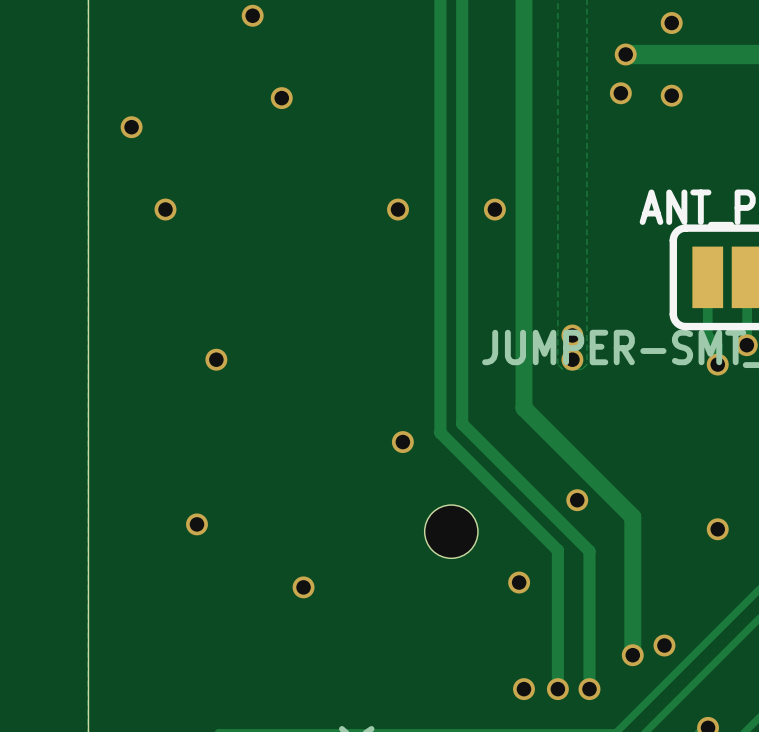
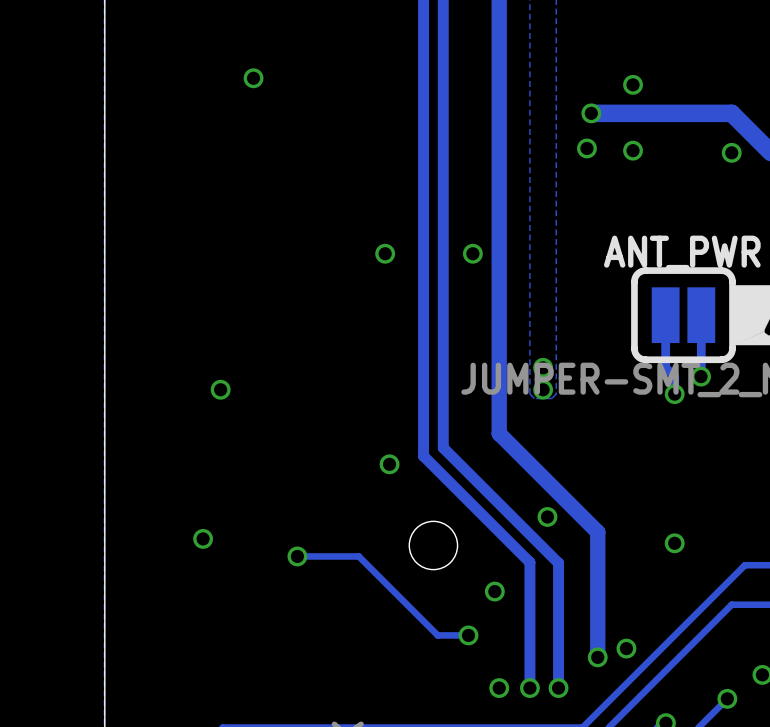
via: (281, 98) -> none
via: (131, 127) -> none
via: (165, 209) -> none
track: none -> (297, 556) (358, 556) (437, 635) (468, 635)
via position: (303, 587) -> (297, 556)
via: none -> (468, 635)

